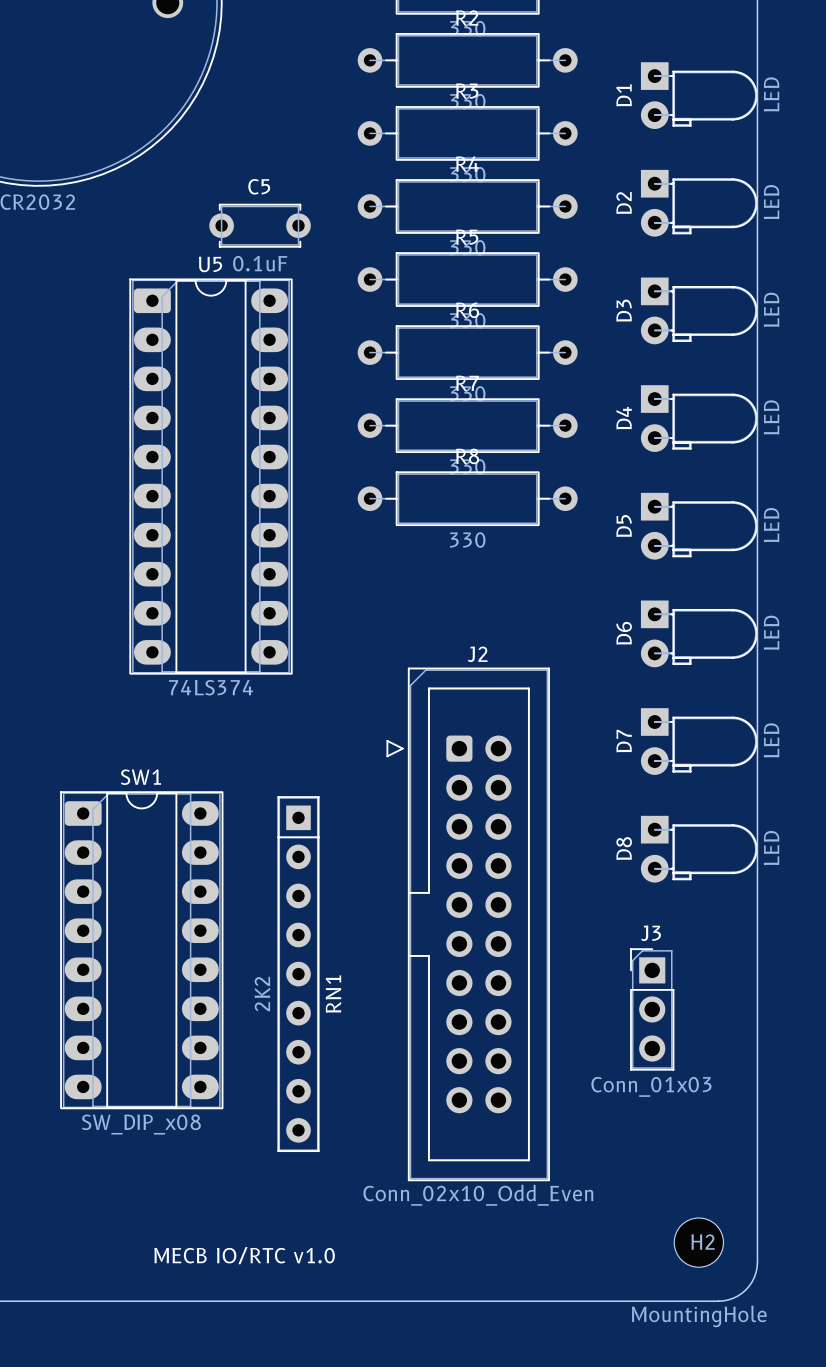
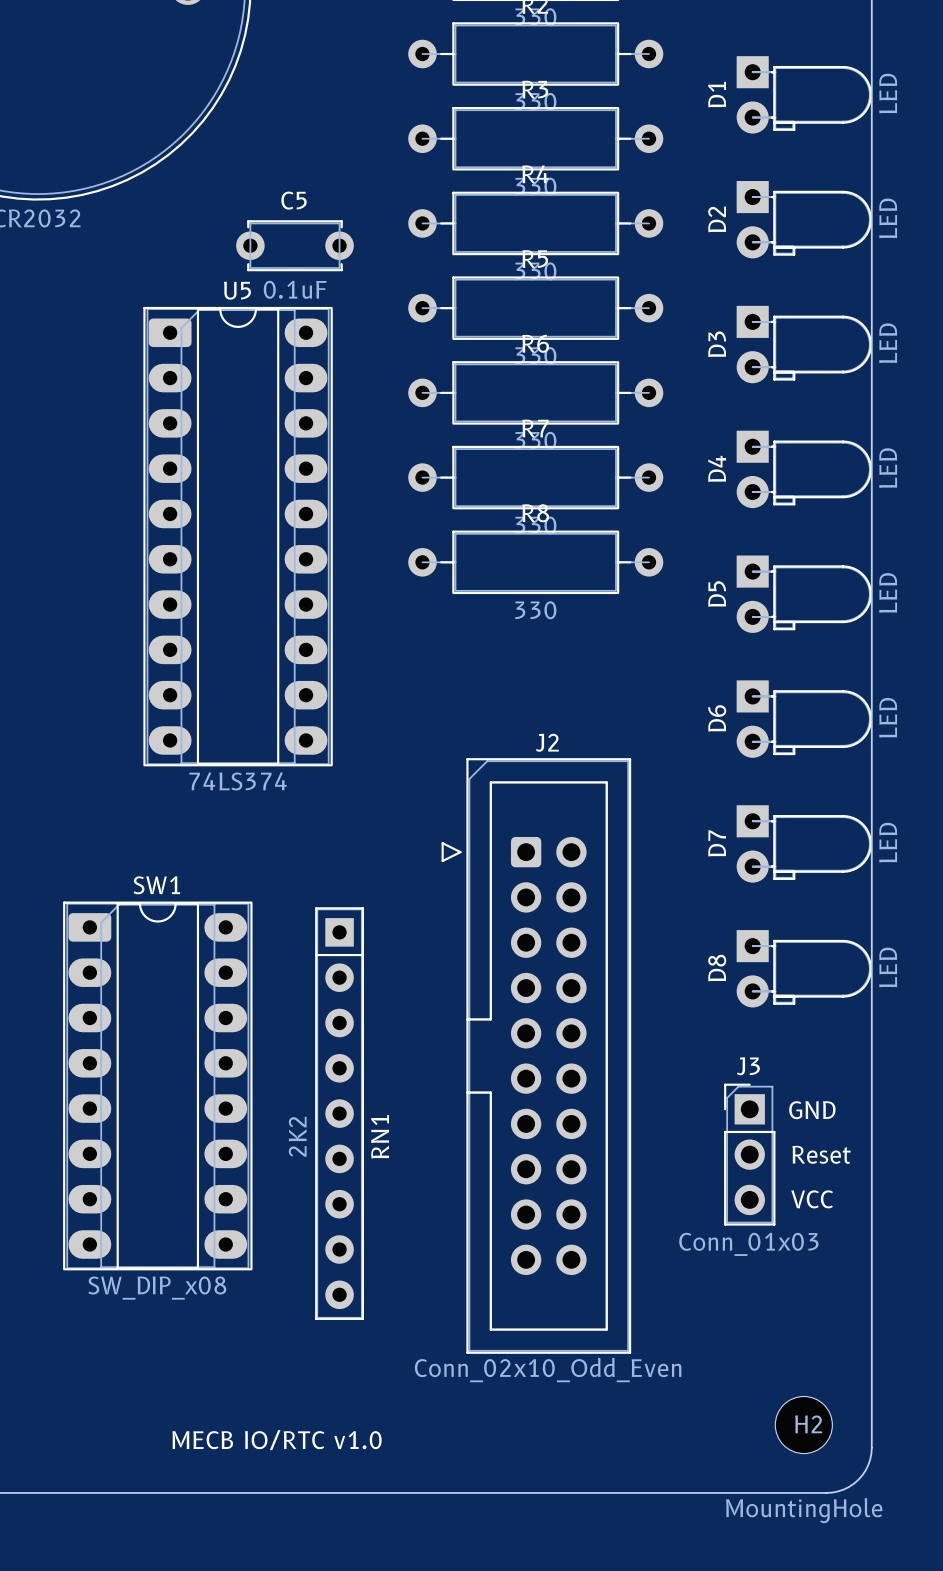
text: none -> GND (812, 1110)
text: none -> Reset (821, 1154)
text: none -> VCC (812, 1199)

